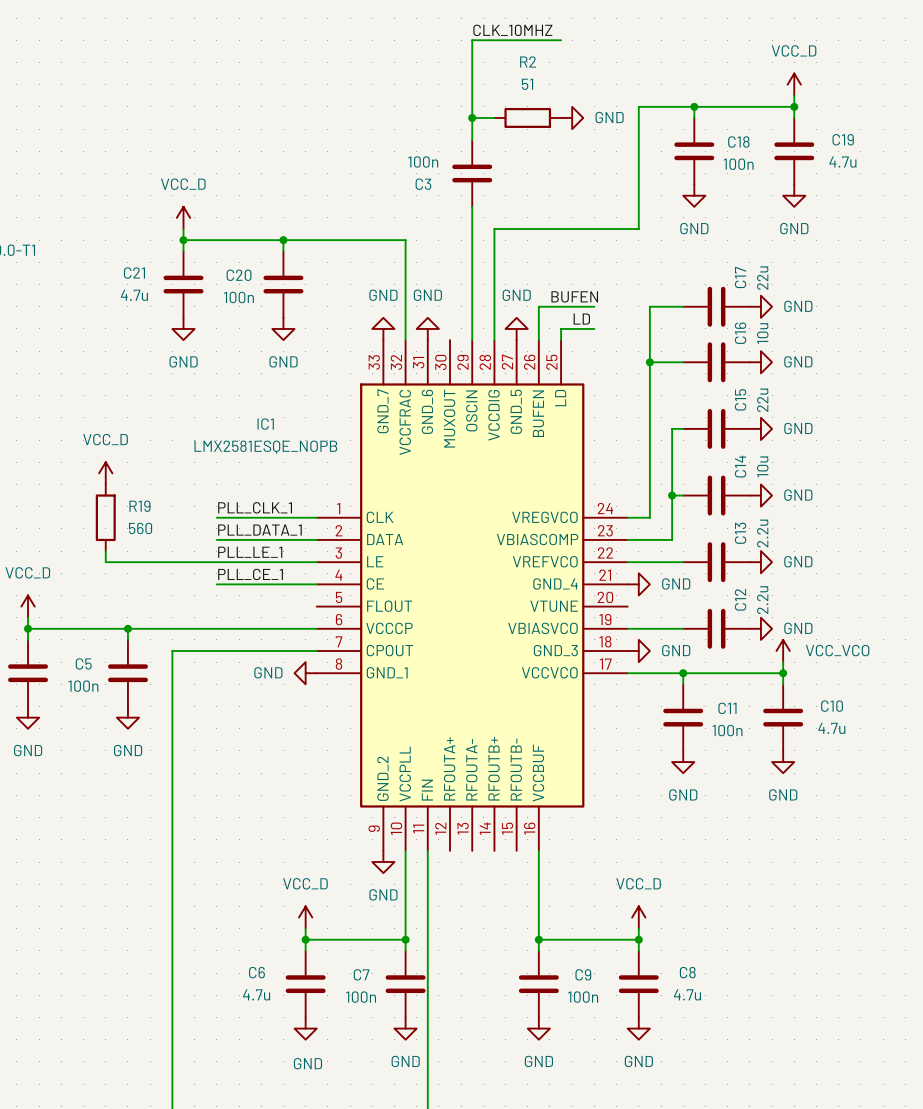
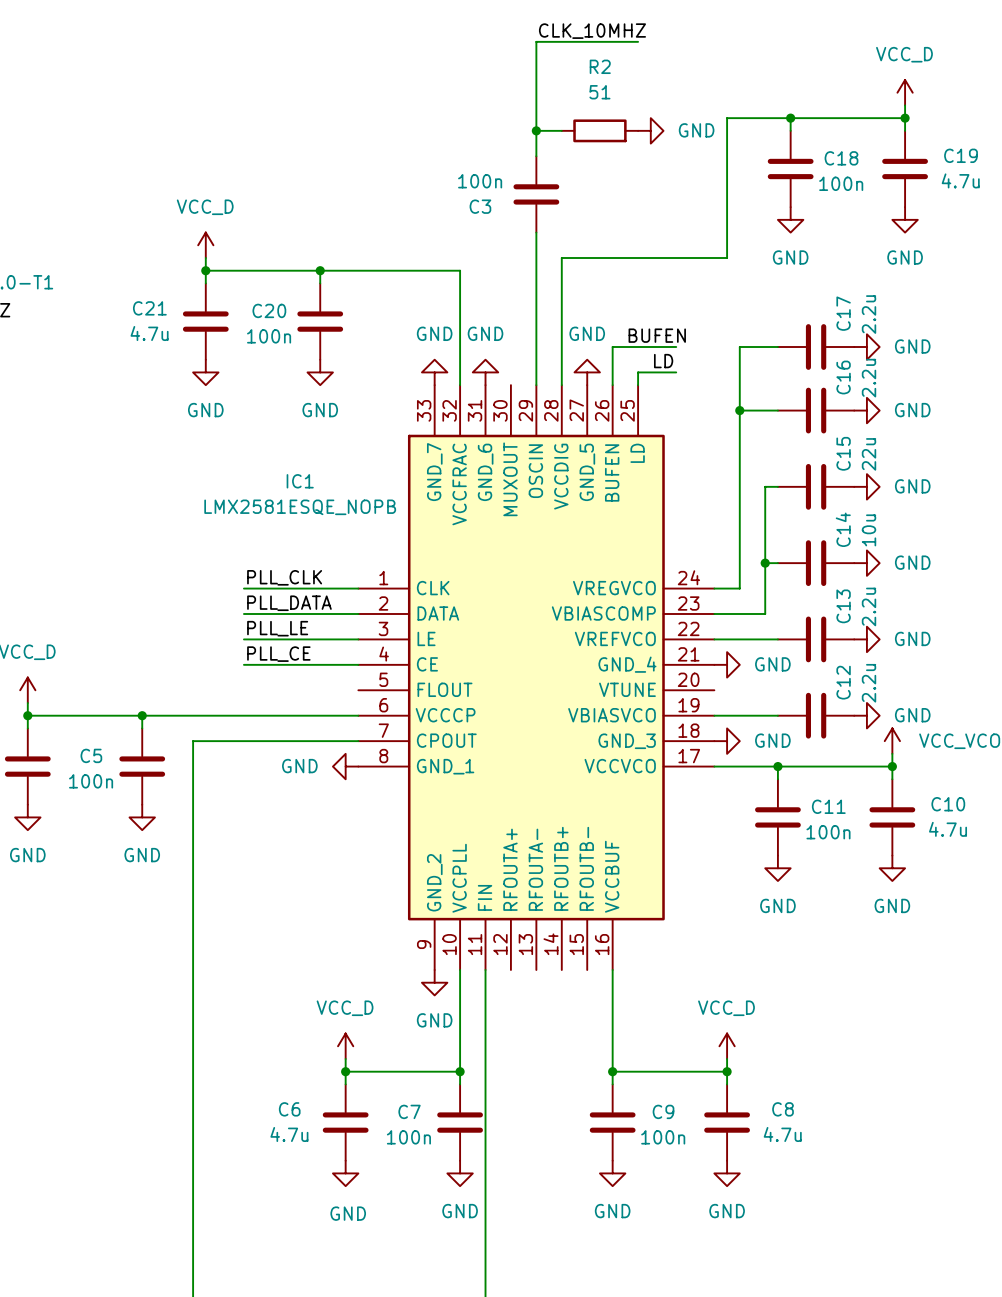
C17 value: 22u (762, 278) -> 2.2u (869, 314)
C16 value: 10u (762, 333) -> 2.2u (869, 378)
power symbol: VCC_D (105, 473) -> none
label: PLL_CLK_1 (255, 507) -> PLL_CLK (284, 577)
R19: 560 (105, 517) -> none
label: PLL_DATA_1 (259, 530) -> PLL_DATA (289, 603)
wire: (105, 551) (105, 562) (216, 562) -> none
label: PLL_LE_1 (250, 552) -> PLL_LE (277, 628)
label: PLL_CE_1 (250, 574) -> PLL_CE (278, 654)

